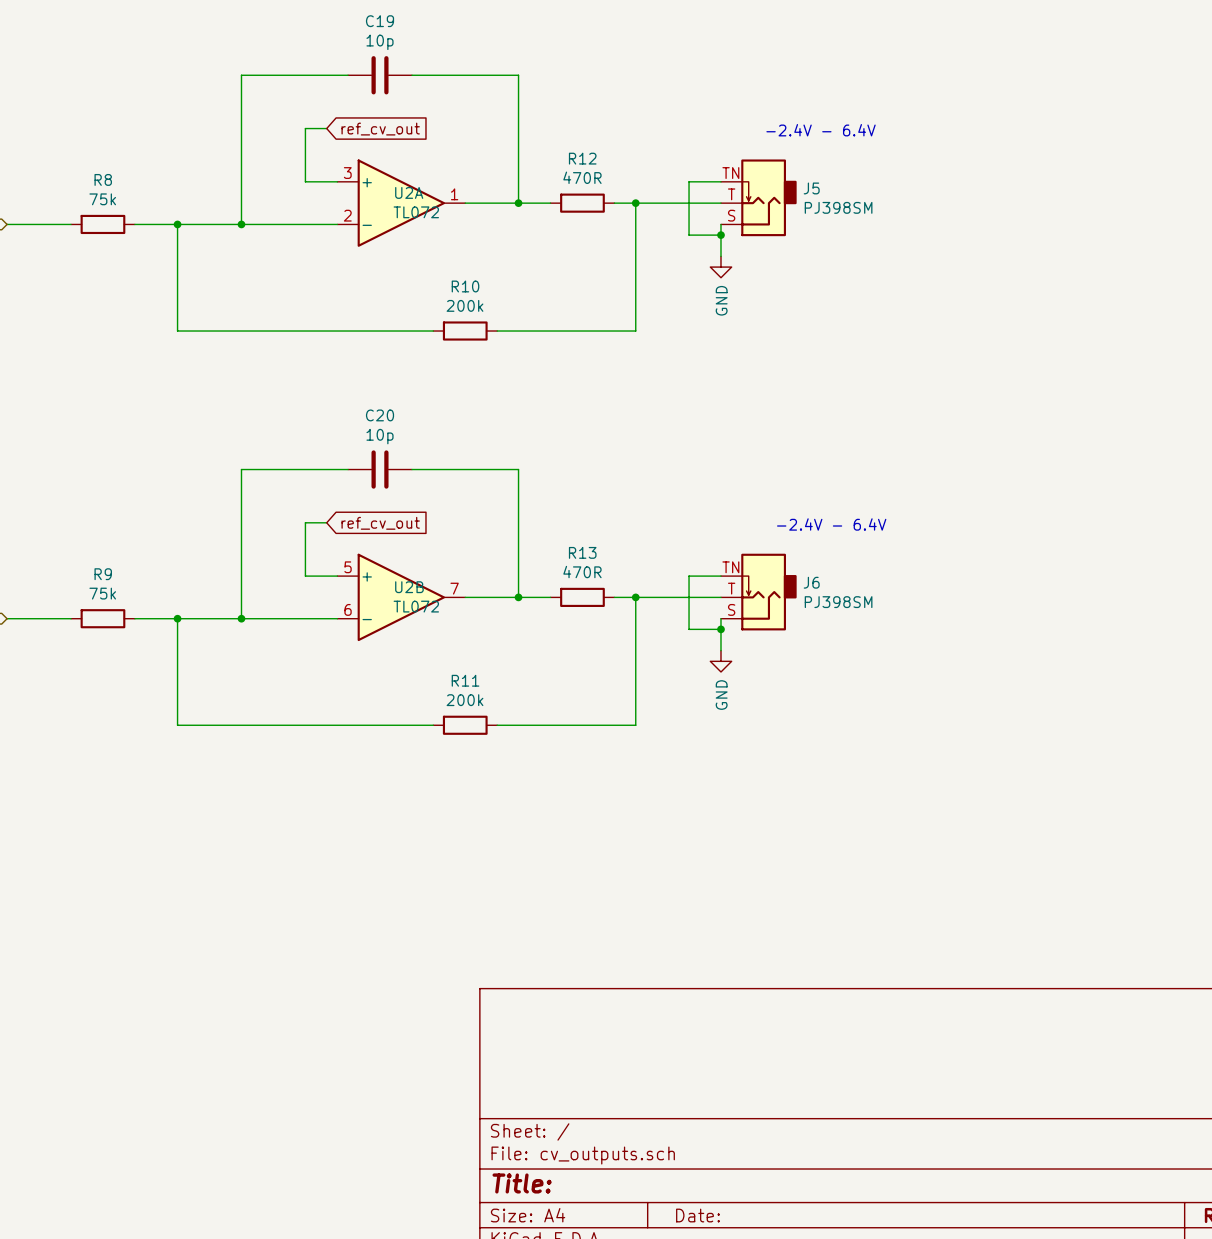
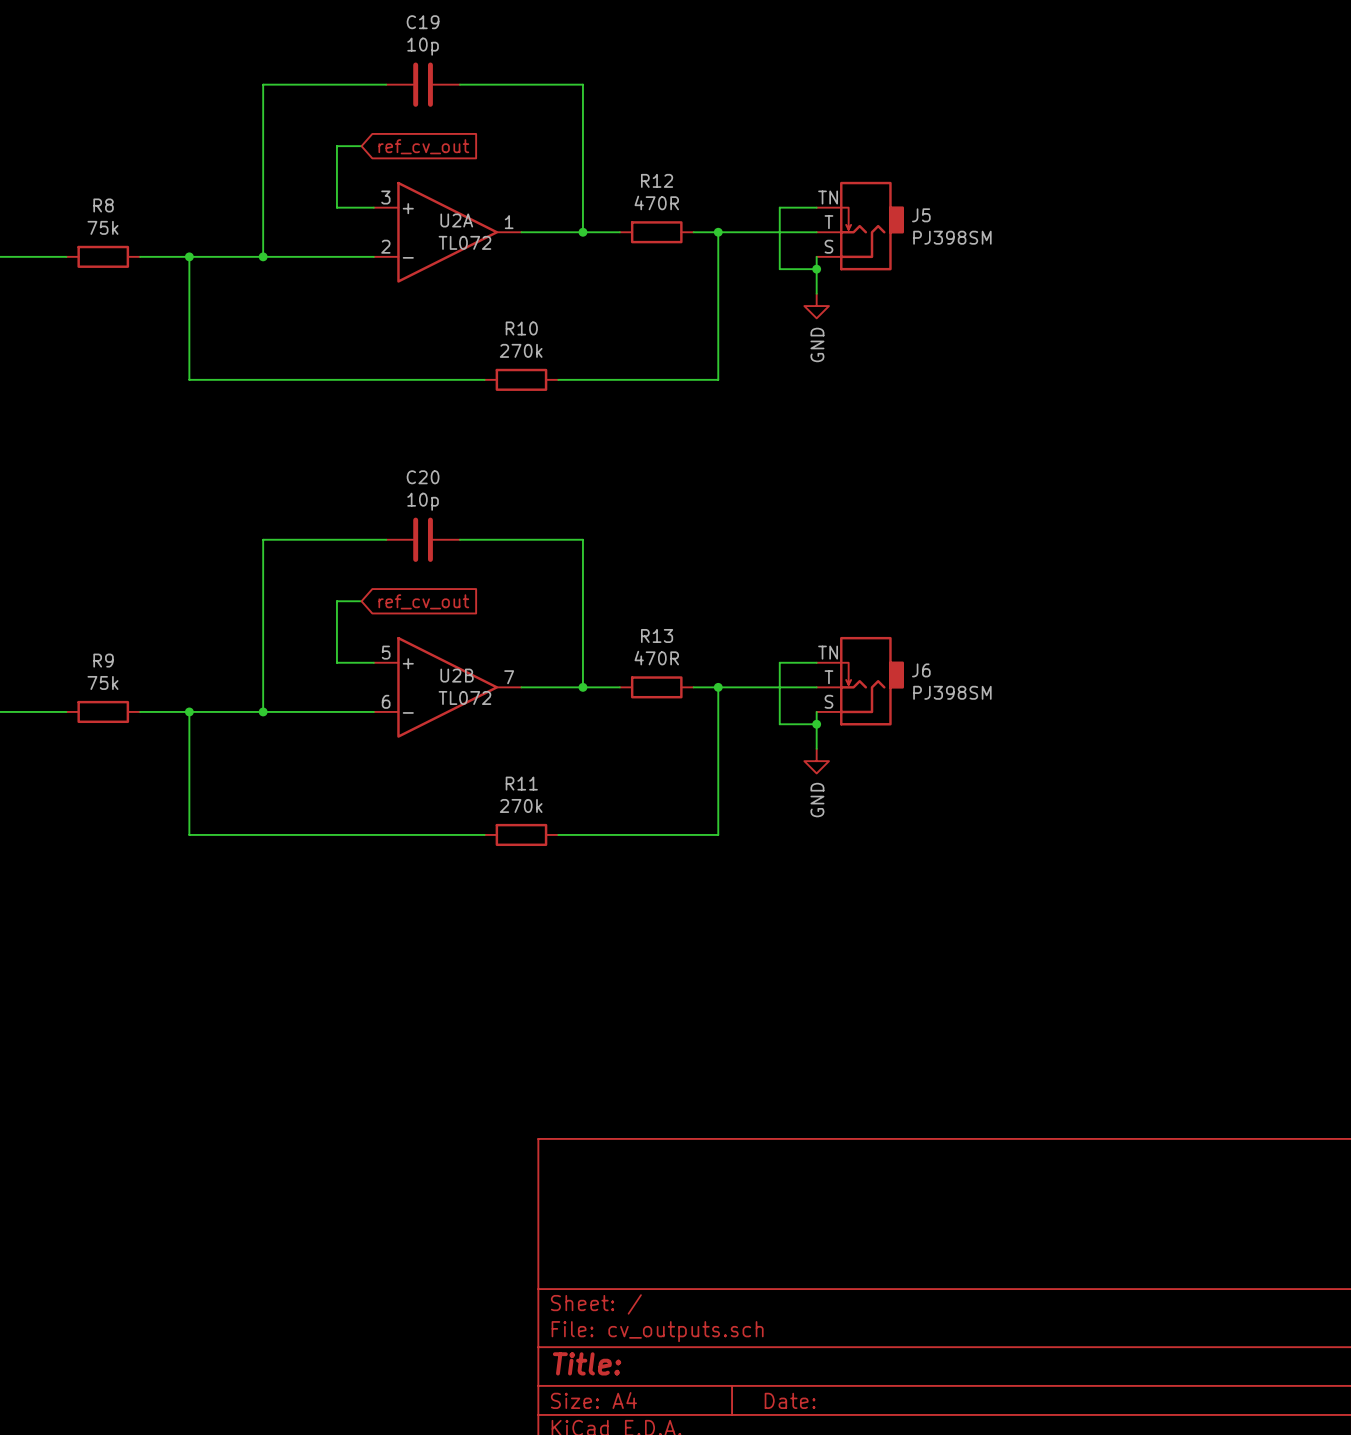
text: -2.4V - 6.4V (821, 130) -> none
R10 value: 200k (465, 305) -> 270k (521, 350)
text: -2.4V - 6.4V (831, 524) -> none
R11 value: 200k (465, 700) -> 270k (521, 805)

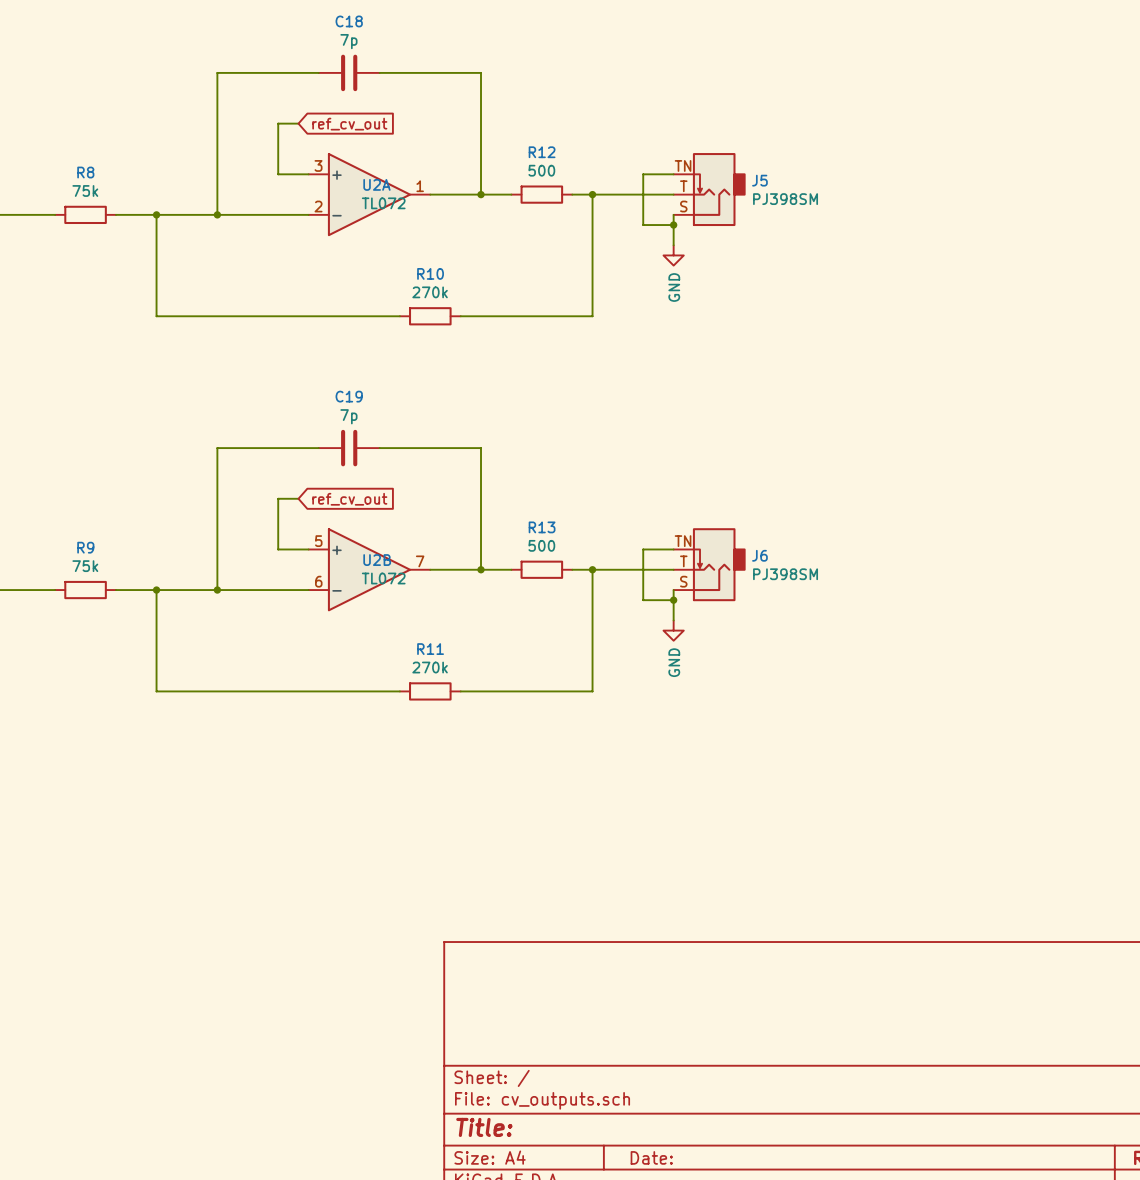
C19 name: C19 (423, 22) -> C18 (349, 21)
C19 value: 10p (423, 46) -> 7p (348, 41)
R12 value: 470R (656, 202) -> 500 (541, 170)
C20 name: C20 (423, 477) -> C19 (349, 396)
C20 value: 10p (423, 501) -> 7p (348, 416)
R13 value: 470R (656, 658) -> 500 (541, 545)

